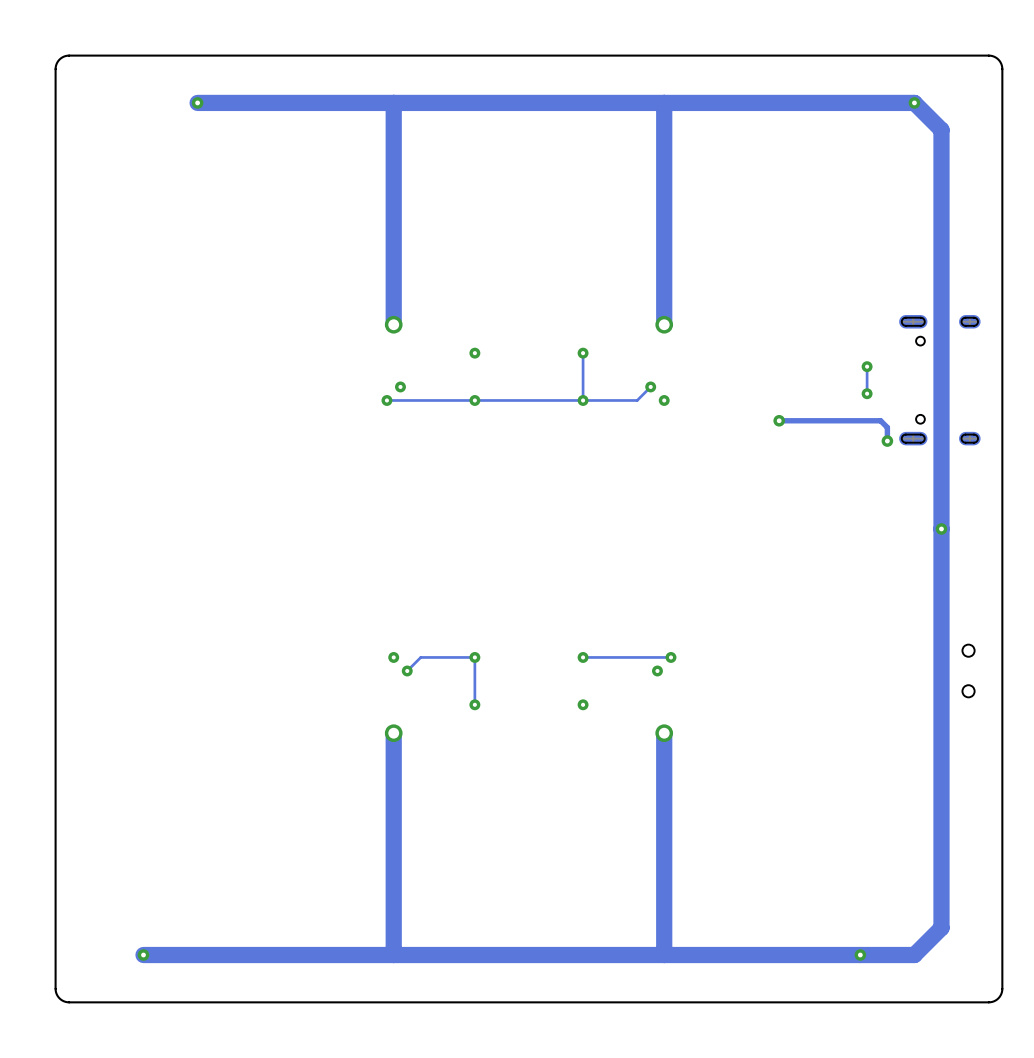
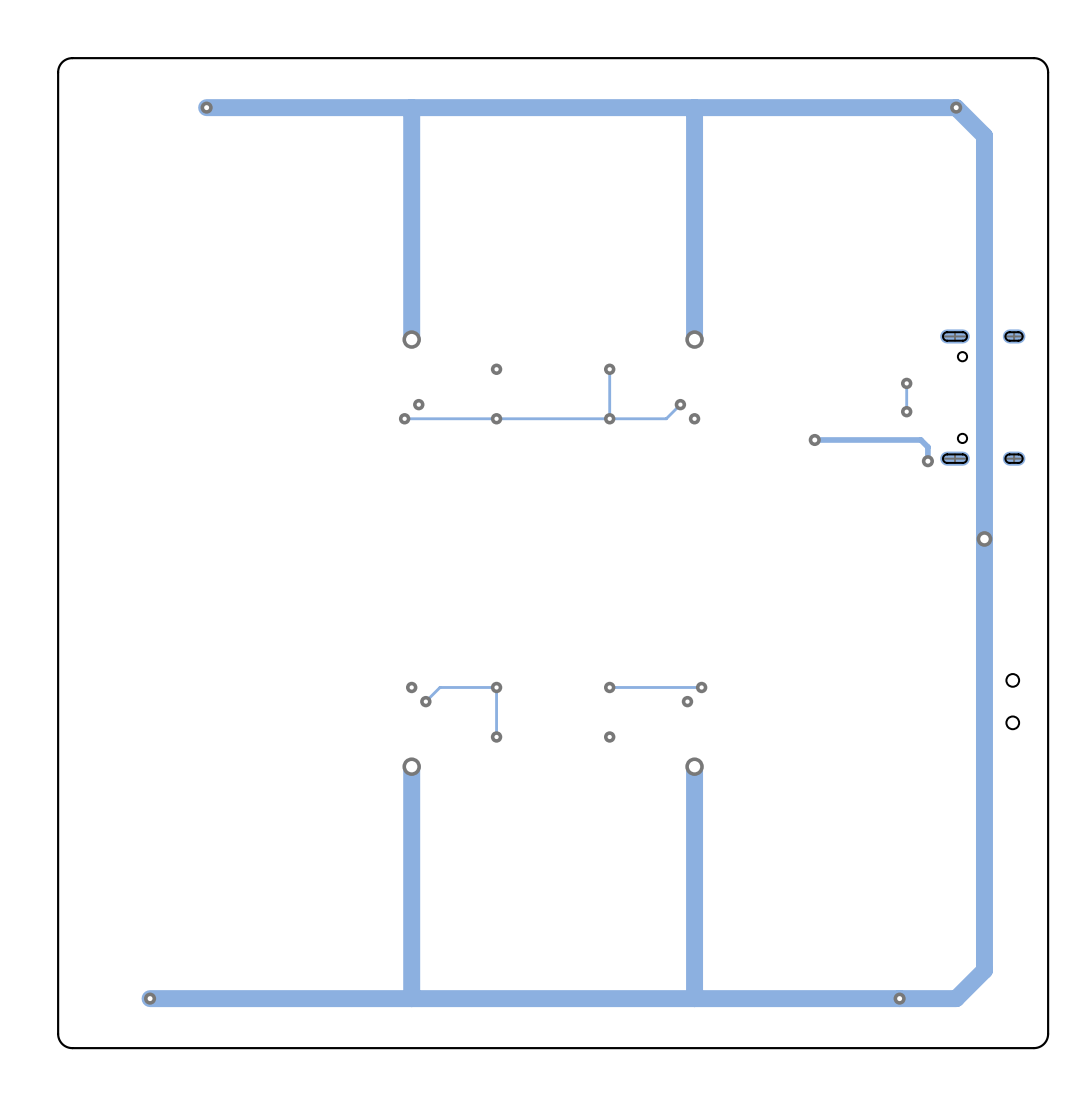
via: none -> (984, 538)
via: (941, 528) -> none

